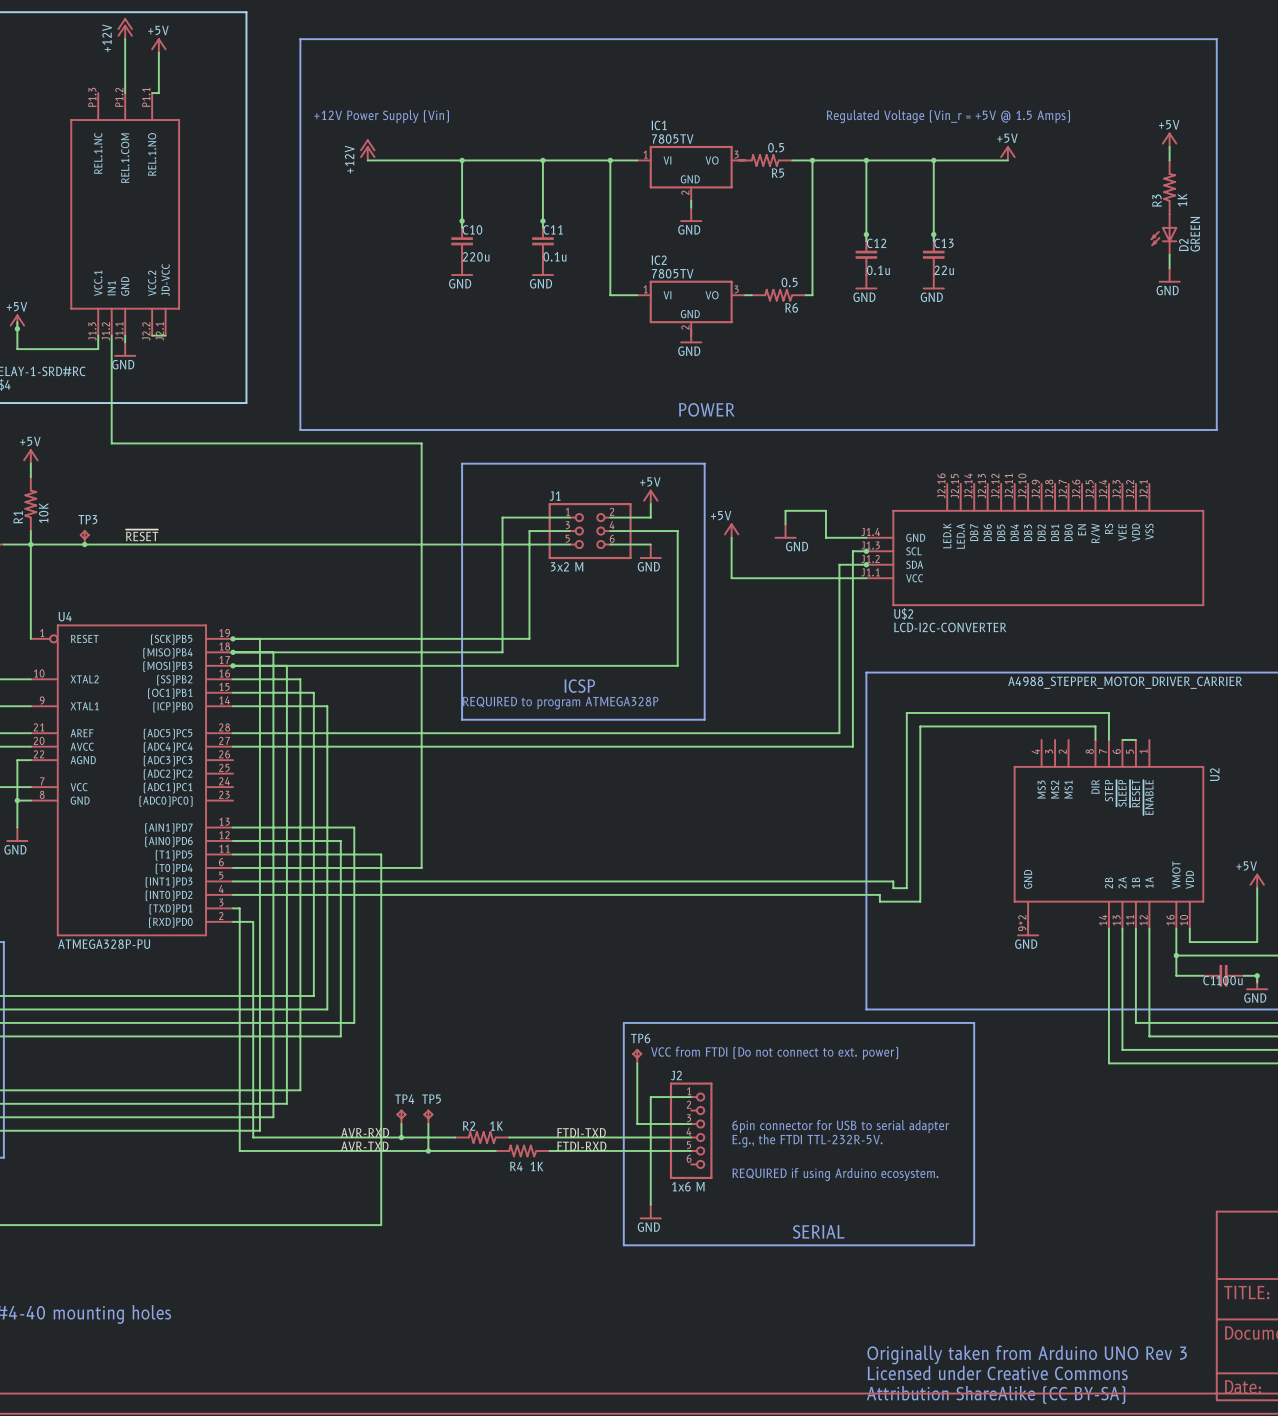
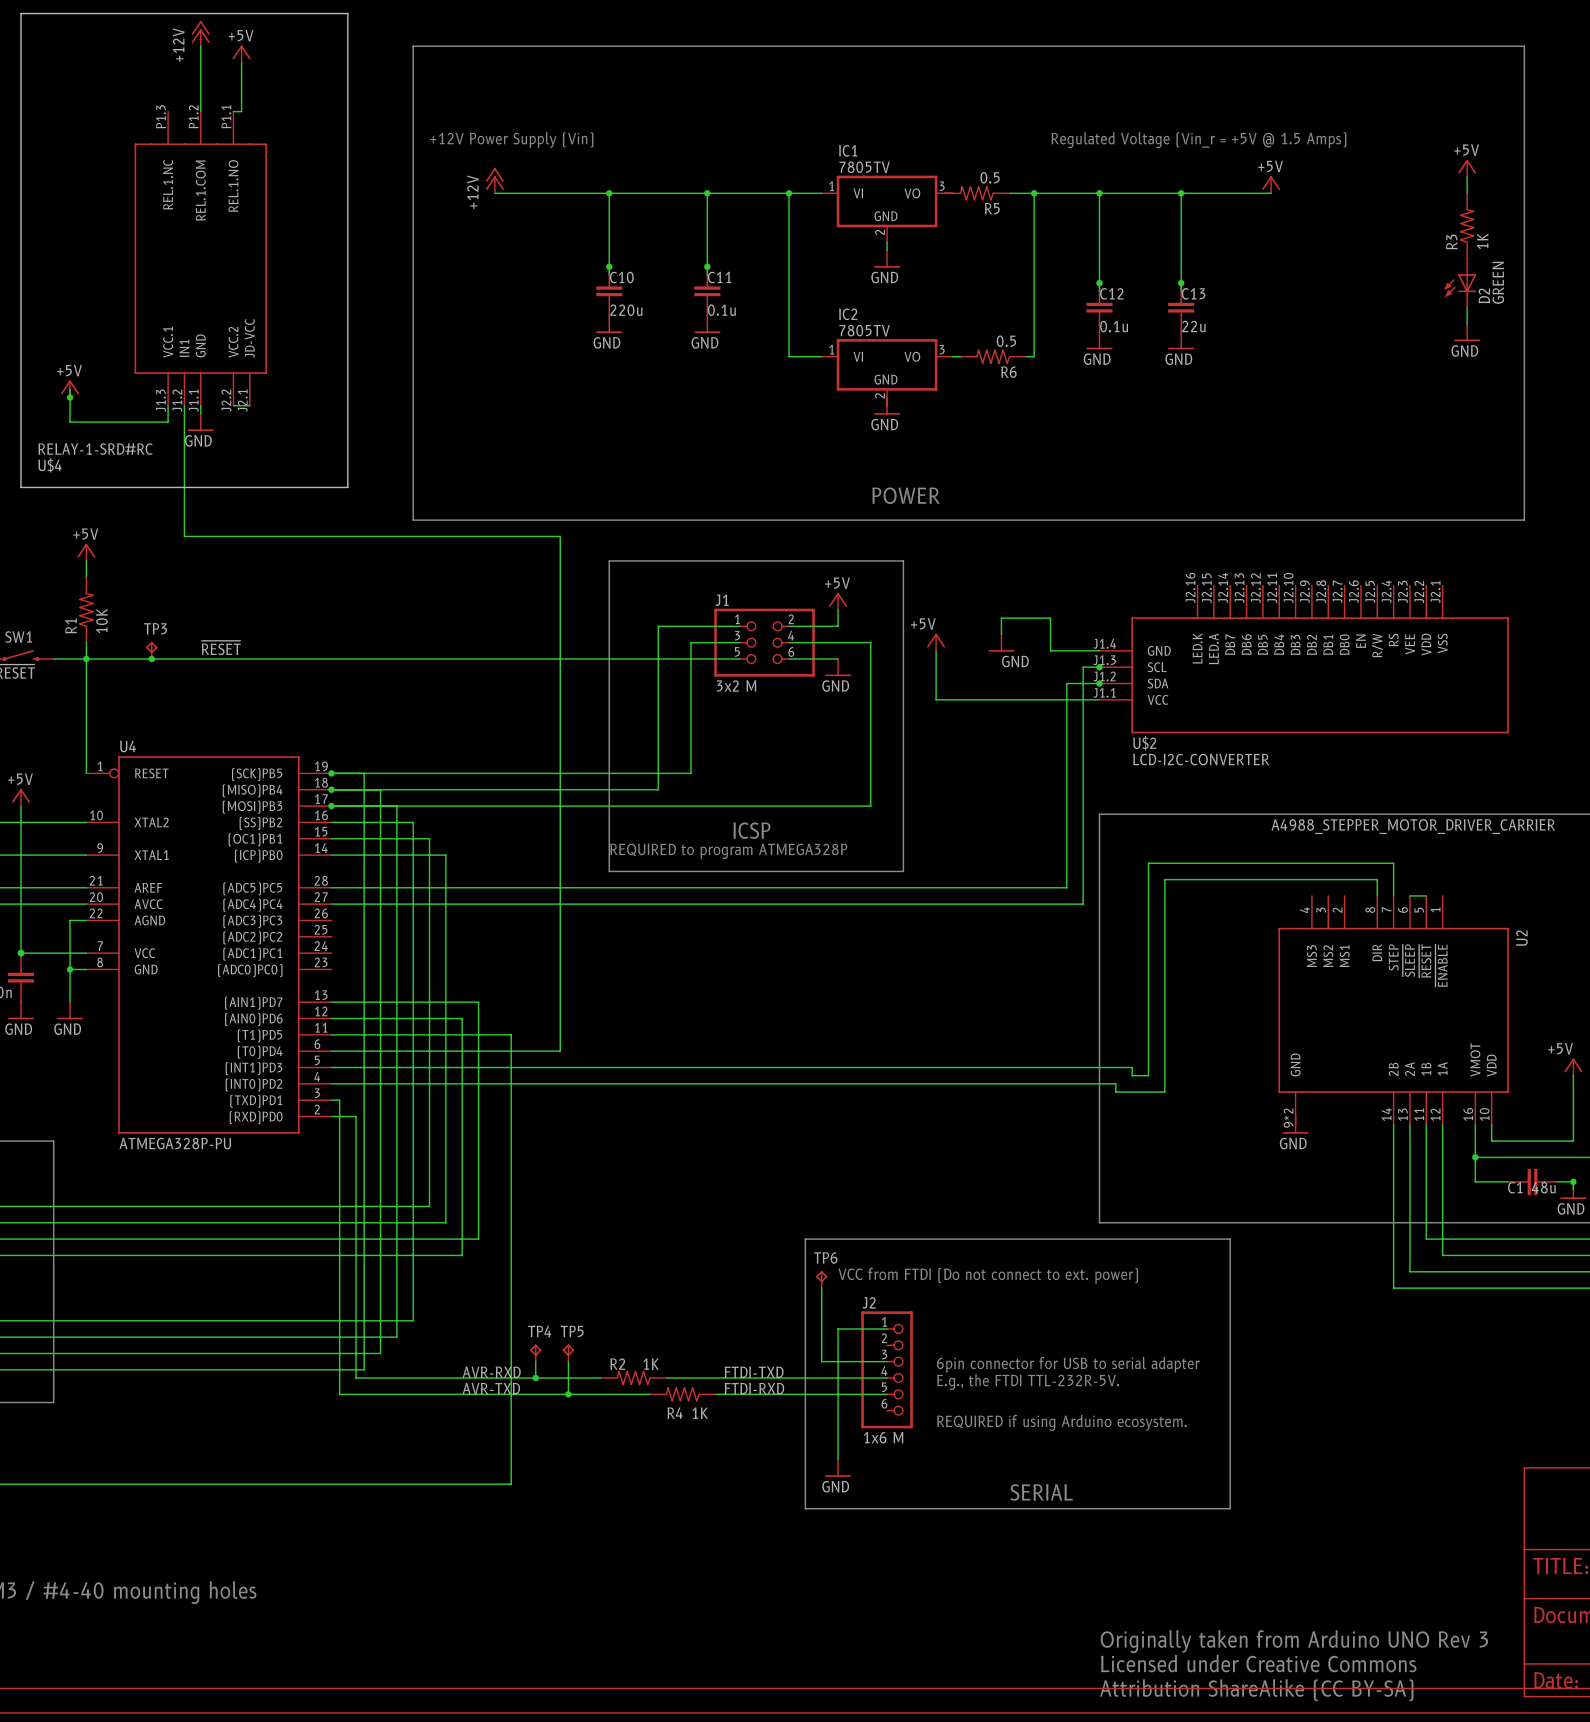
C1 value: 100u (1229, 980) -> 48u (1543, 1187)

